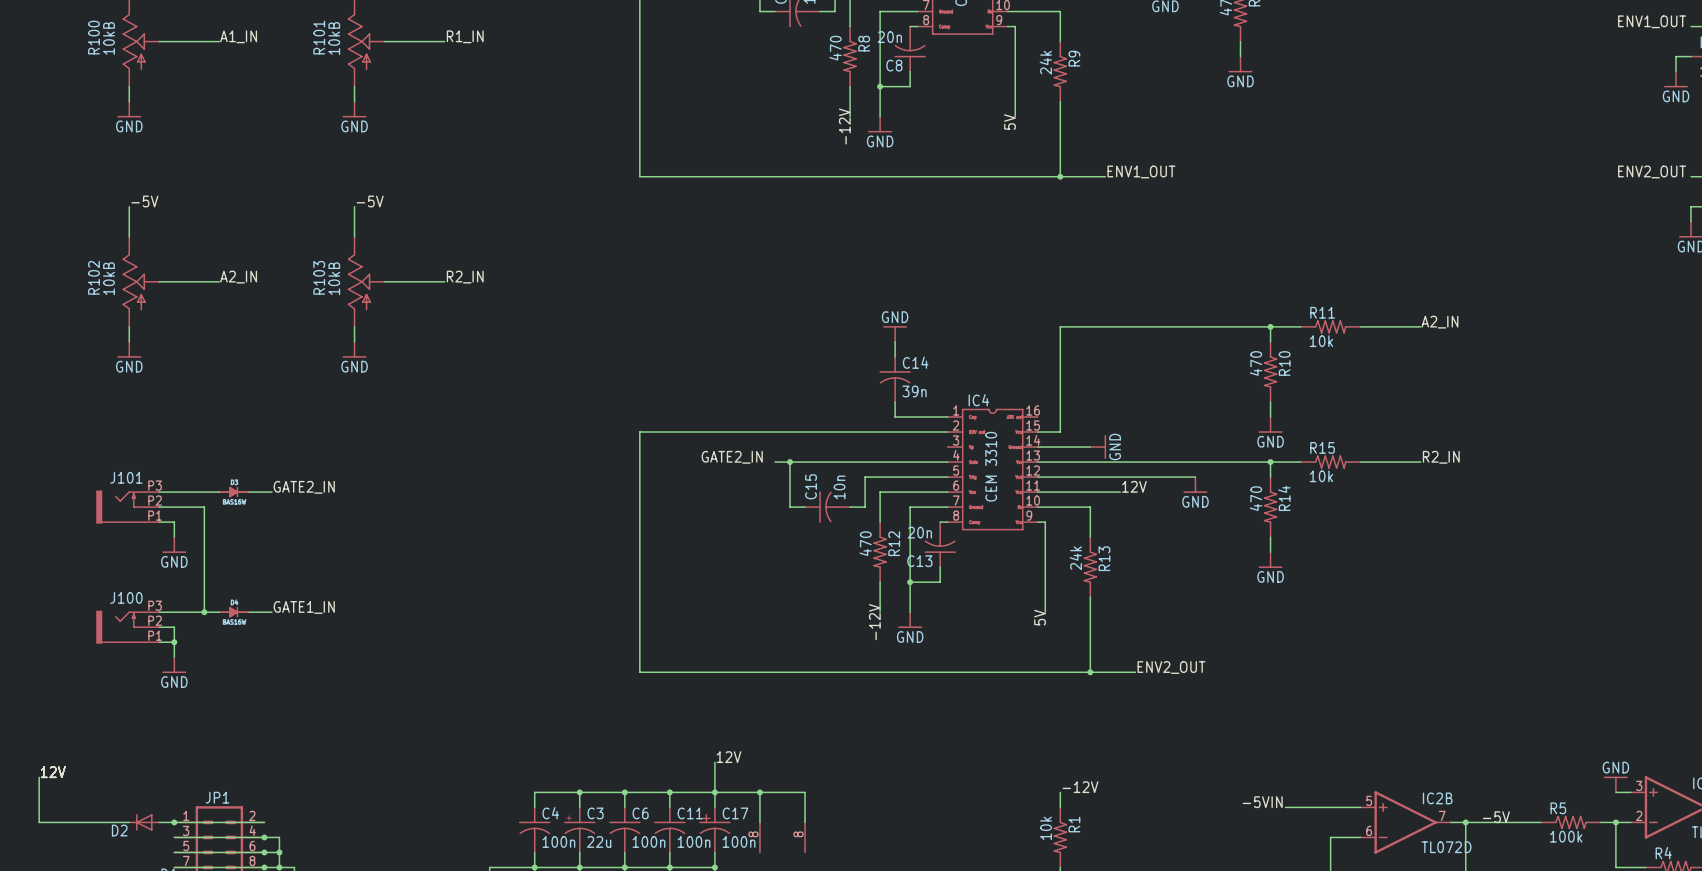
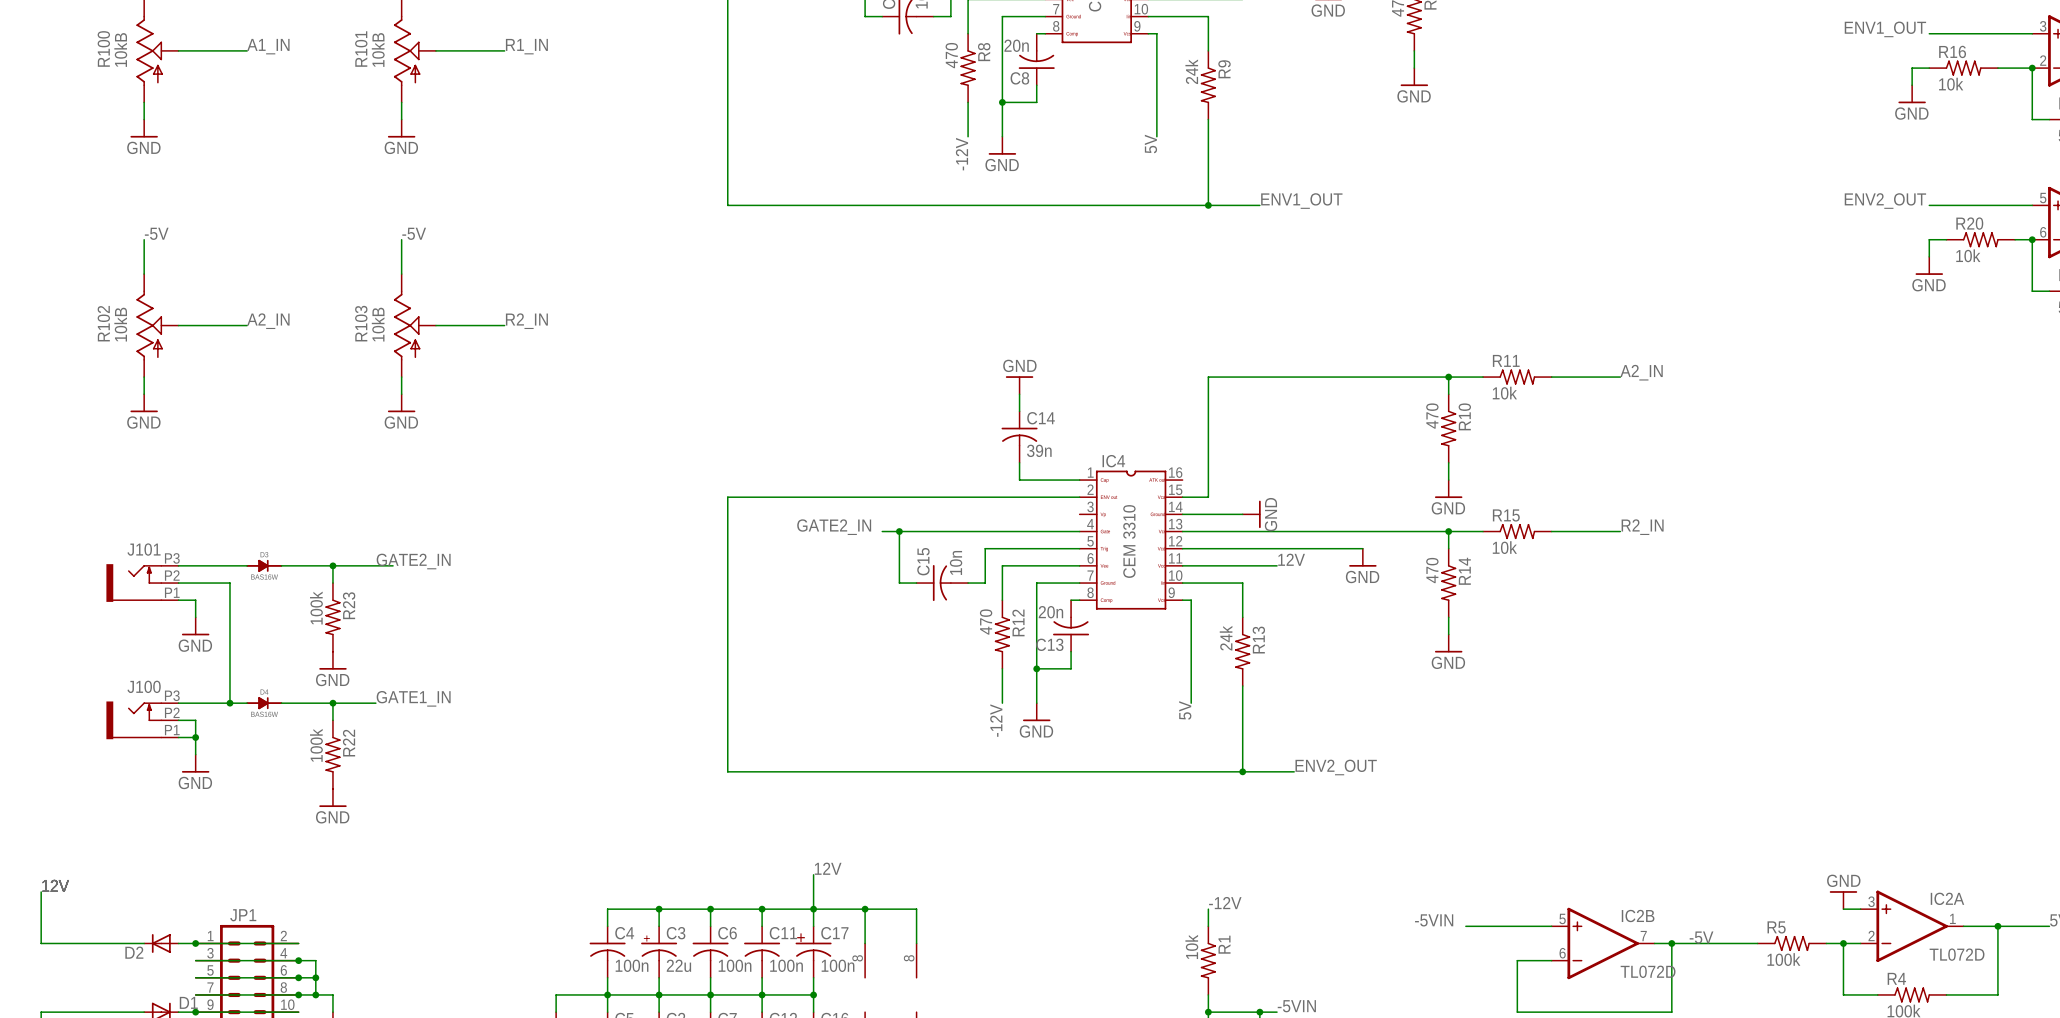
label position: GATE2_IN (304, 487) -> GATE2_IN (413, 561)
wire: none -> (307, 565) (393, 565)
wire: none -> (332, 565) (332, 583)
junction: none -> (332, 565)
R23: none -> 100k (332, 617)
power symbol: none -> GND (332, 660)
label position: GATE1_IN (304, 607) -> GATE1_IN (413, 698)
wire: none -> (307, 703) (375, 703)
wire: none -> (332, 703) (332, 720)
junction: none -> (332, 703)
R22: none -> 100k (332, 754)
power symbol: none -> GND (332, 798)

